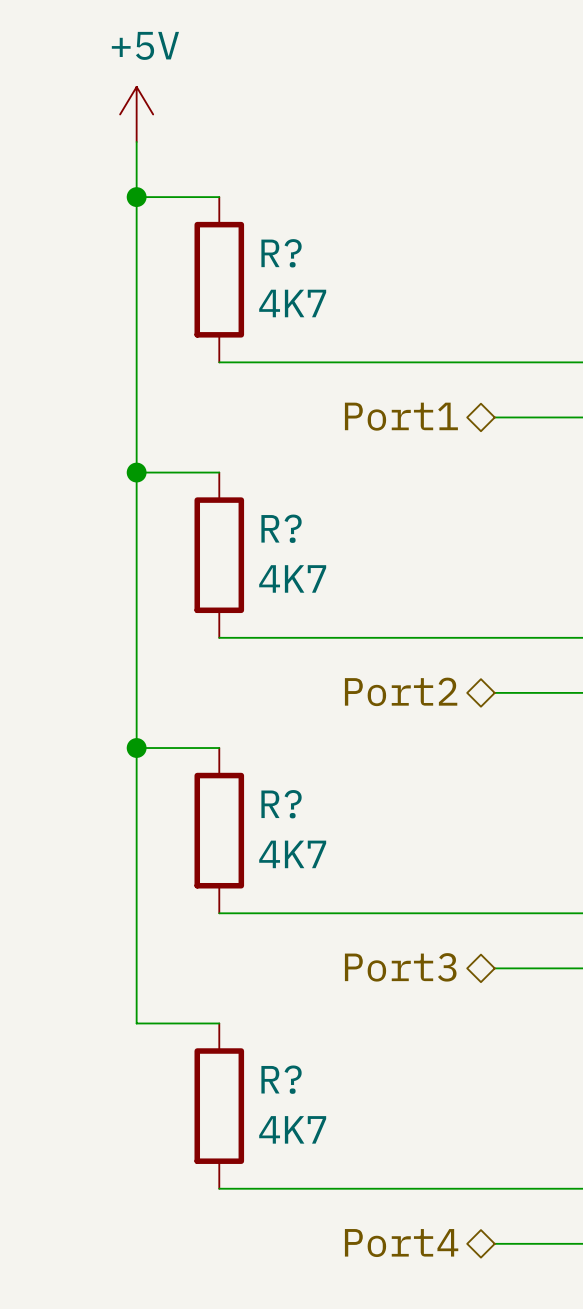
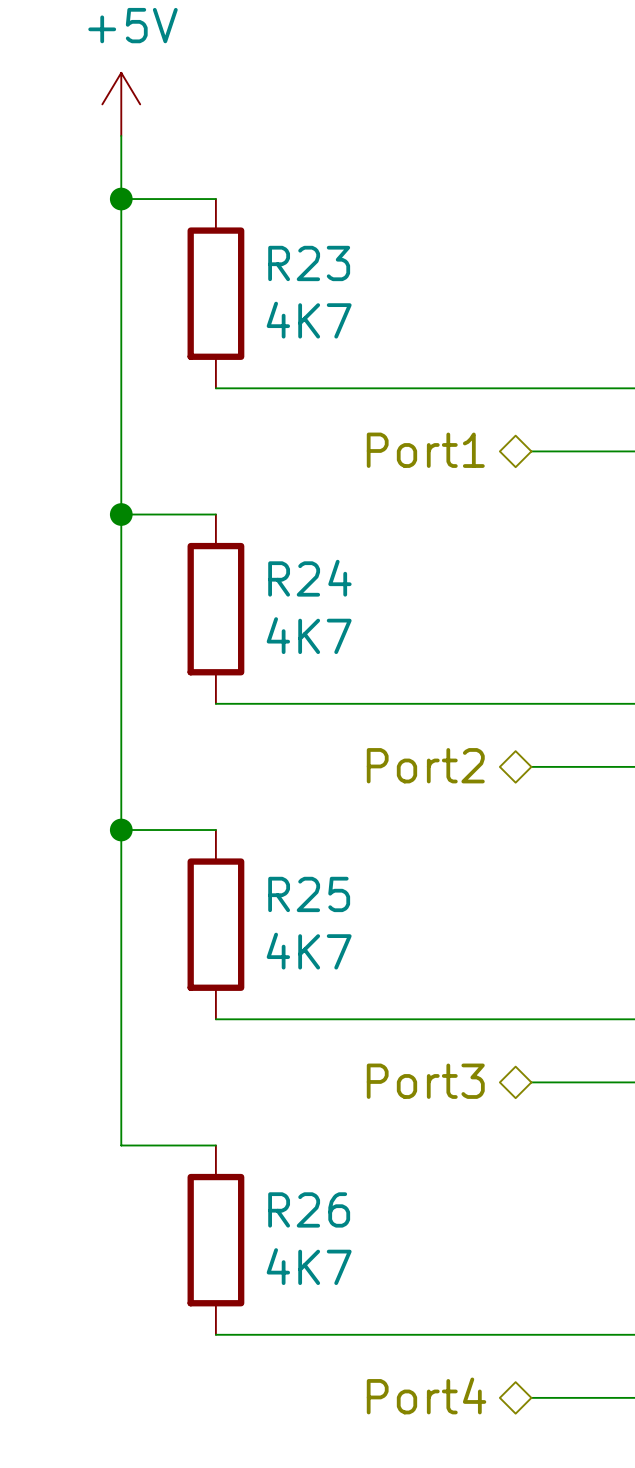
R? name: R? (281, 253) -> R23 (309, 263)
R? name: R? (281, 528) -> R24 (309, 578)
R? name: R? (281, 804) -> R25 (309, 894)
R? name: R? (281, 1079) -> R26 (309, 1209)

